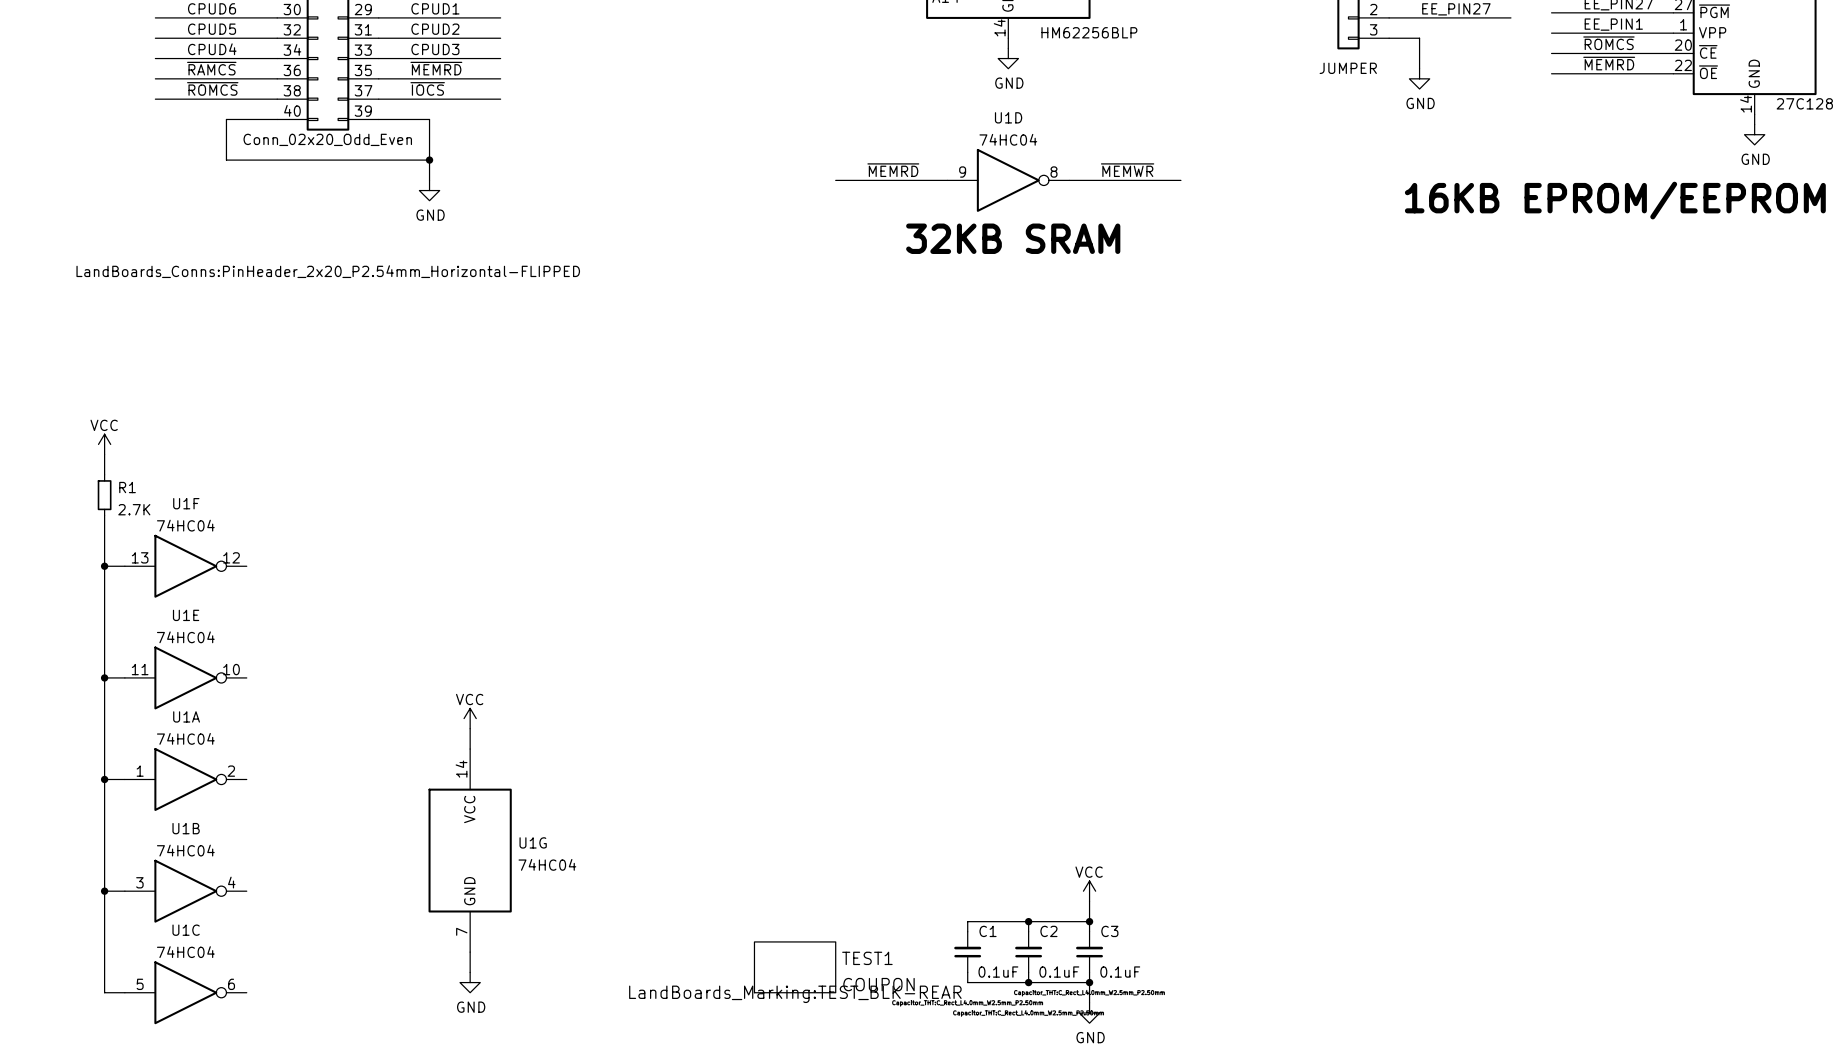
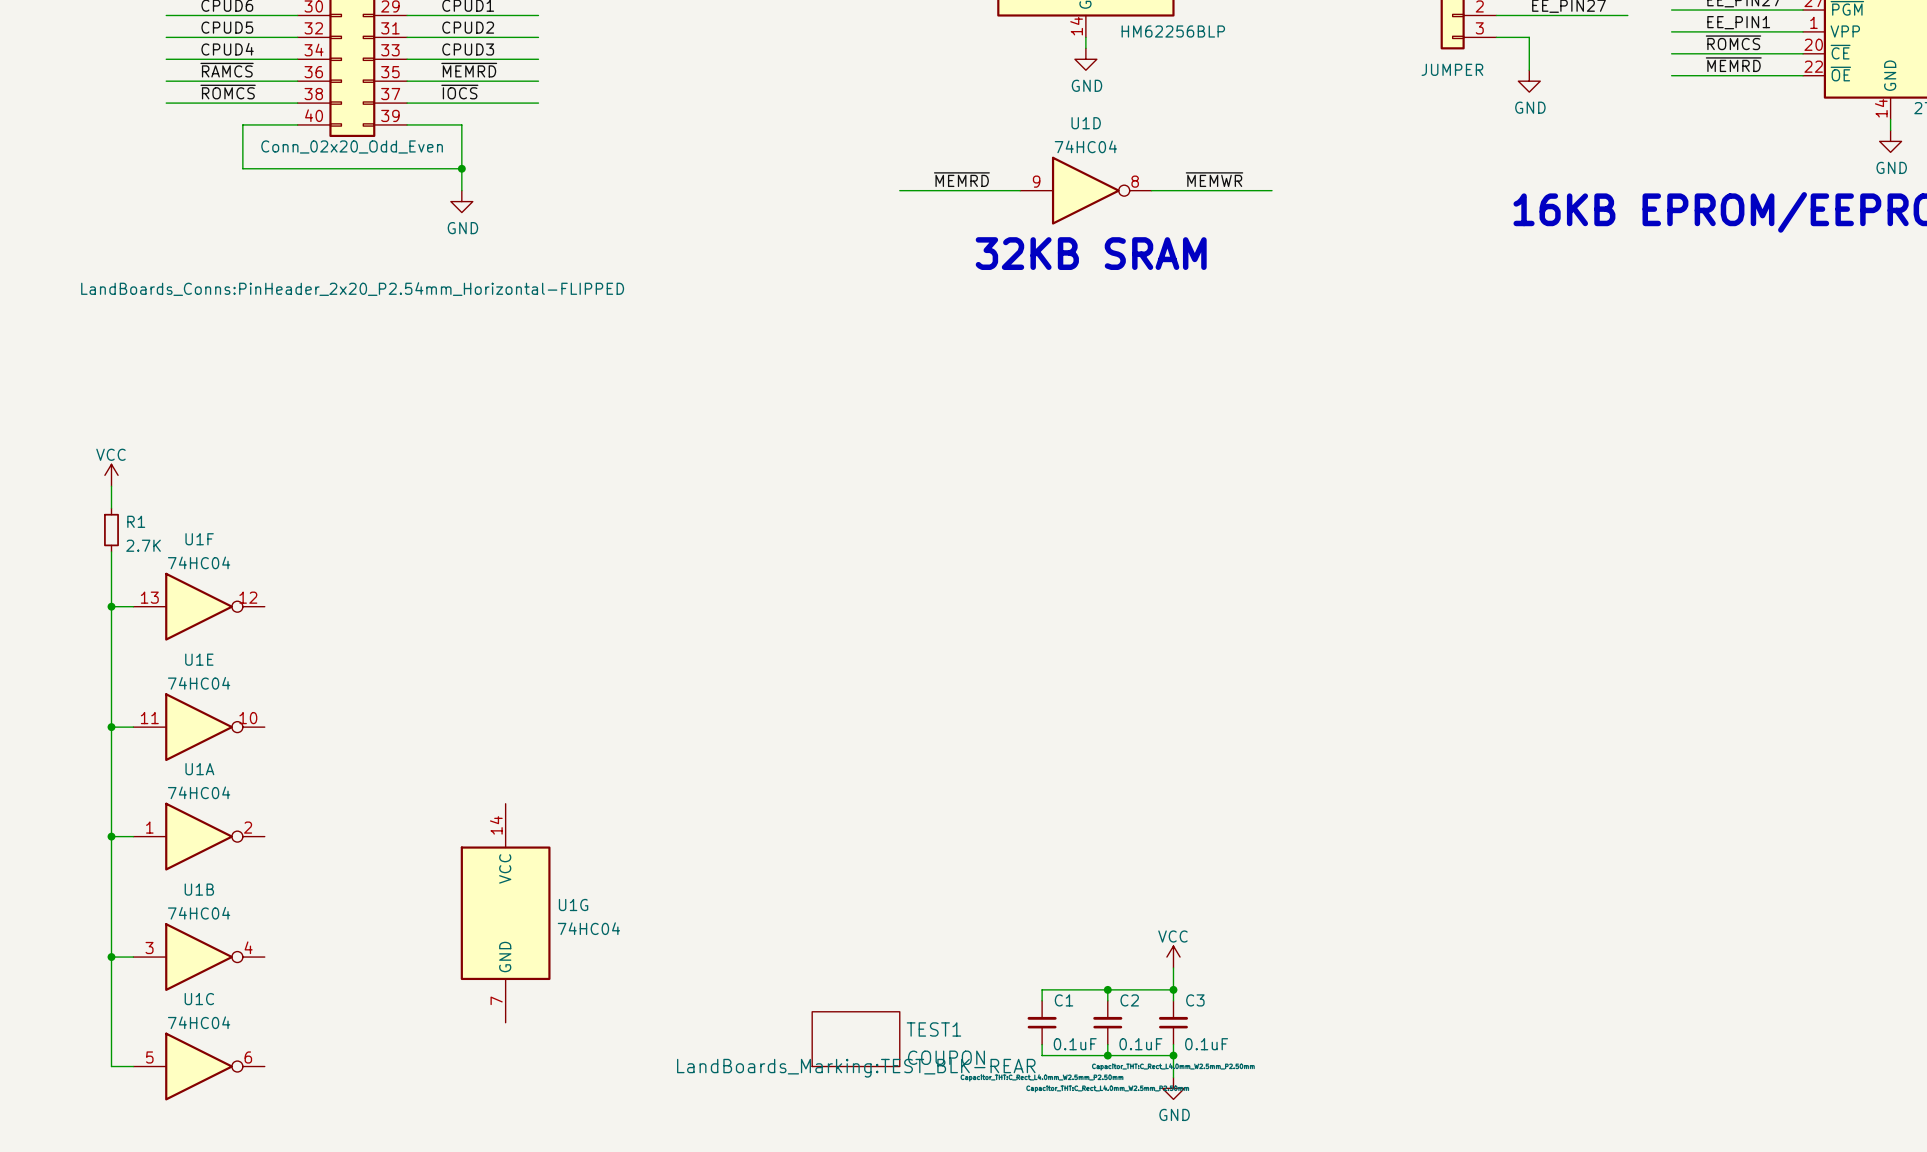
power symbol: VCC (470, 718) -> none
wire: (470, 728) (470, 749) -> none
wire: (470, 952) (470, 972) -> none
power symbol: GND (470, 982) -> none

